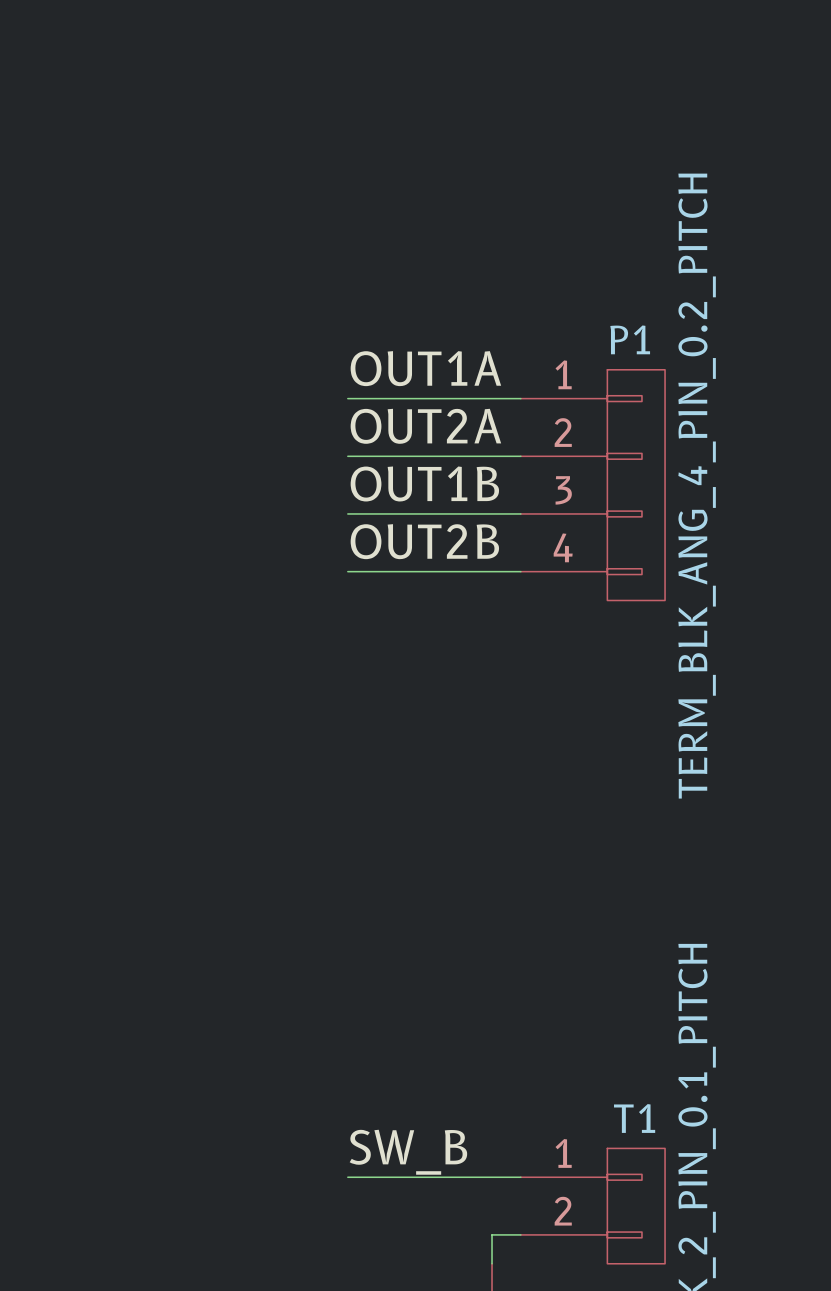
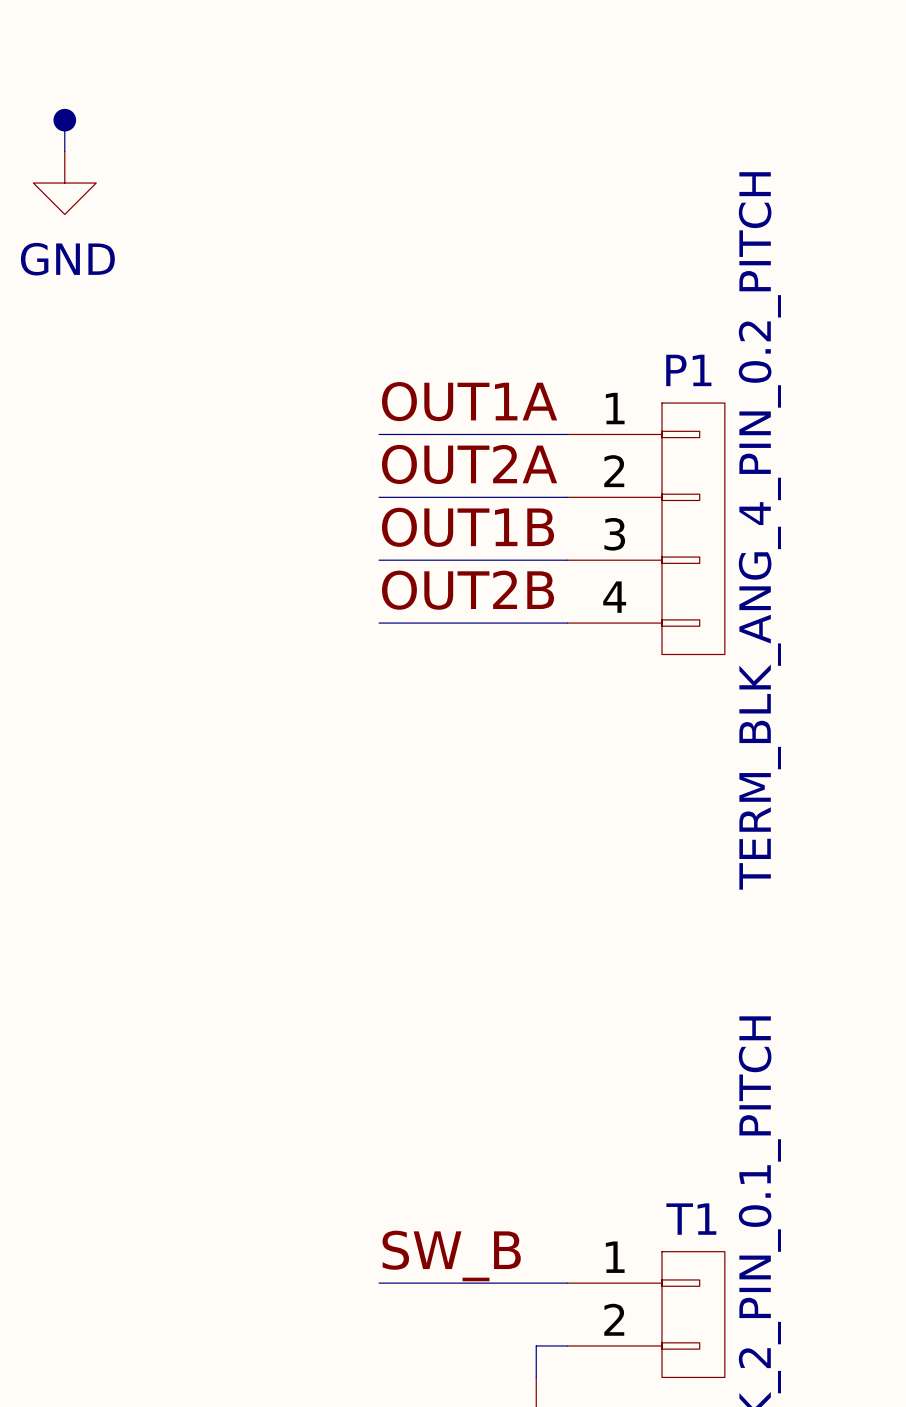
wire: none -> (64, 120) (64, 151)
junction: none -> (64, 120)
power symbol: none -> GND (64, 183)

